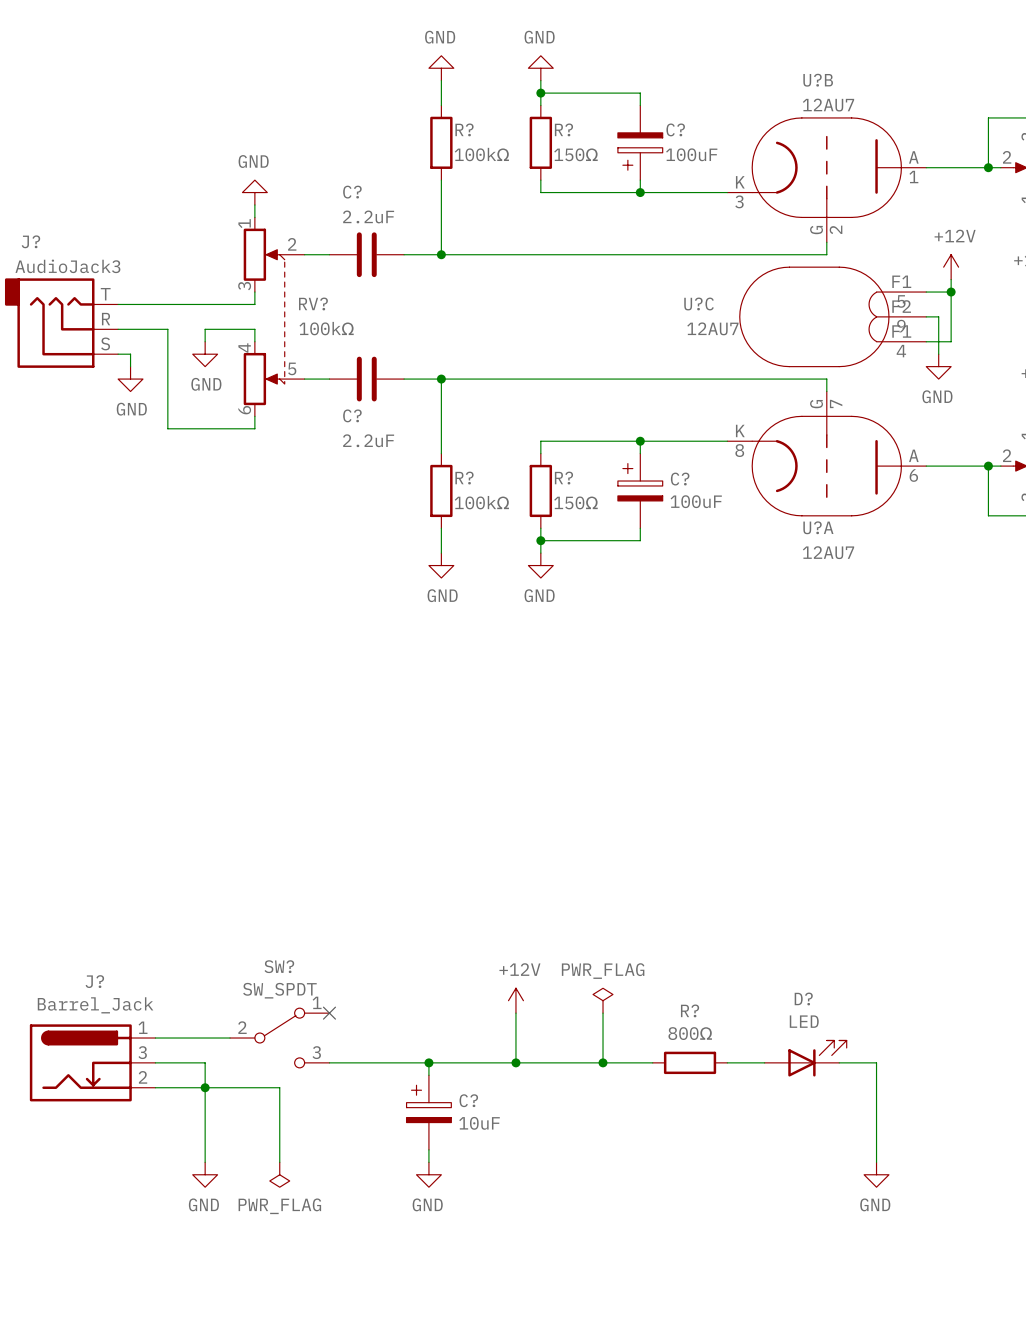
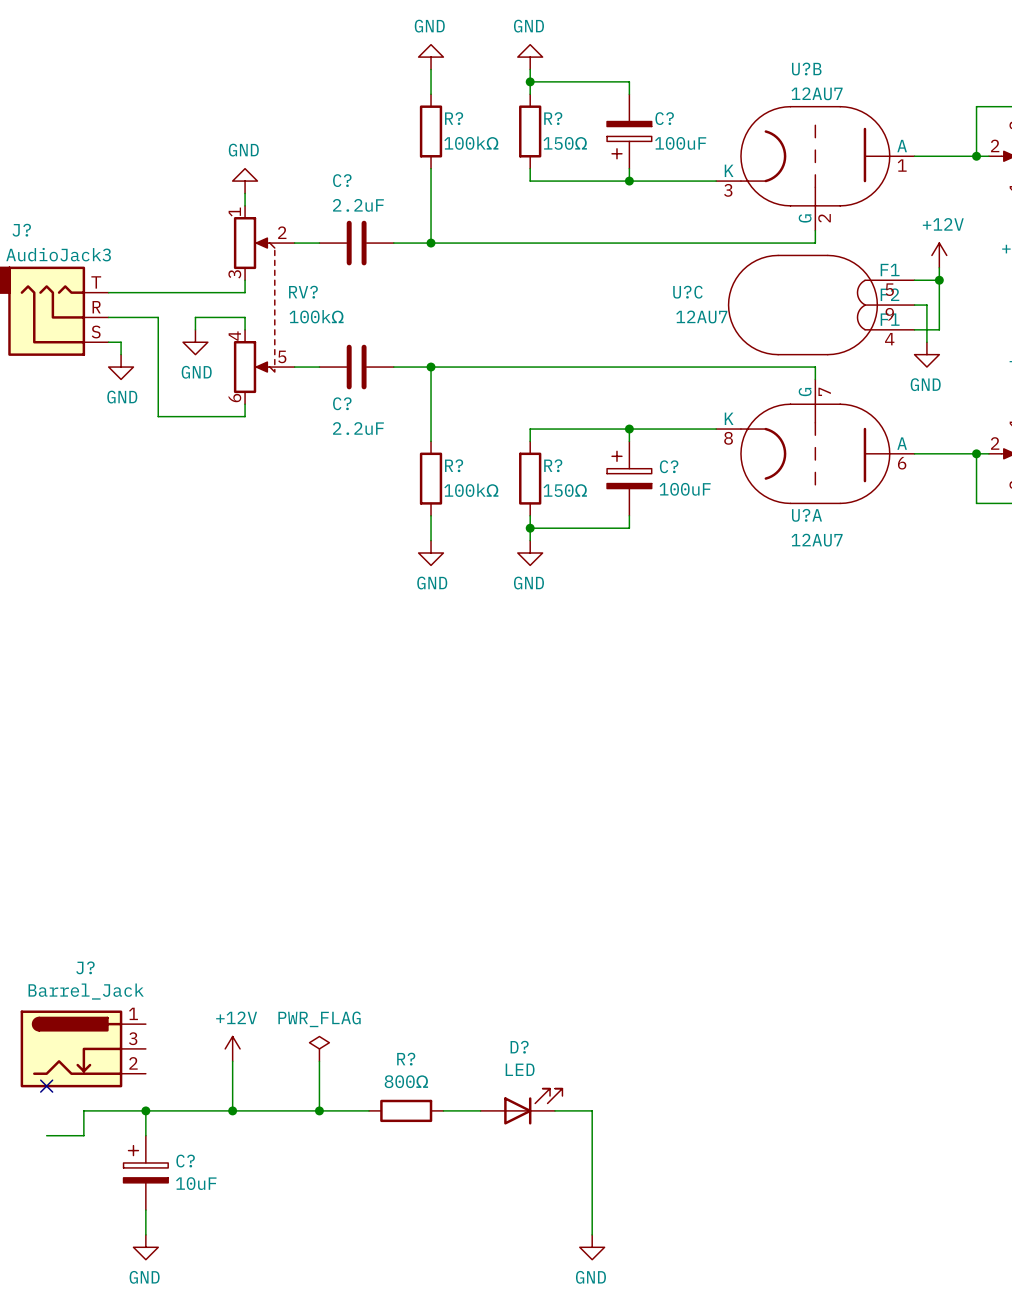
power symbol: +12V (515, 1000) -> none
power symbol: PWR_FLAG (603, 1000) -> none
no-connect mark: (329, 1013) -> none
wire: (515, 1013) (515, 1062) -> (319, 1061) (319, 1110)
wire: (603, 1013) (603, 1062) -> none
wire: (155, 1038) (230, 1038) -> none
SW?: SW_SPDT (279, 1038) -> none
D?: LED (805, 1058) -> none
wire: (155, 1062) (205, 1062) (205, 1162) -> none
power symbol: none -> +12V (232, 1048)
wire: (329, 1062) (652, 1062) -> none
wire: (428, 1062) (428, 1075) -> none
junction: (428, 1062) -> none
junction: (515, 1062) -> none
junction: (603, 1062) -> none
R?: 800Ω (690, 1062) -> none
wire: (727, 1062) (764, 1062) -> none
wire: (839, 1062) (876, 1062) (876, 1162) -> none
wire: none -> (232, 1061) (232, 1110)
wire: (155, 1087) (279, 1087) (279, 1162) -> none
junction: (205, 1087) -> none
no-connect mark: none -> (46, 1086)
C?: 10uF (428, 1112) -> none
D?: none -> LED (521, 1106)
wire: none -> (145, 1110) (145, 1135)
junction: none -> (145, 1110)
junction: none -> (232, 1110)
junction: none -> (319, 1110)
wire: none -> (369, 1110) (83, 1110) (83, 1135) (46, 1135)
R?: none -> 800Ω (406, 1110)
wire: none -> (443, 1110) (480, 1110)
wire: none -> (554, 1110) (592, 1110) (592, 1234)
wire: (428, 1149) (428, 1162) -> none
power symbol position: GND (205, 1174) -> GND (145, 1247)
power symbol rotation: 0° (279, 1174) -> 180° (319, 1048)
power symbol position: PWR_FLAG (279, 1174) -> PWR_FLAG (319, 1048)
power symbol: GND (428, 1174) -> none
power symbol: GND (876, 1174) -> none
C?: none -> 10uF (145, 1172)
wire: none -> (145, 1210) (145, 1234)
power symbol: none -> GND (592, 1247)

